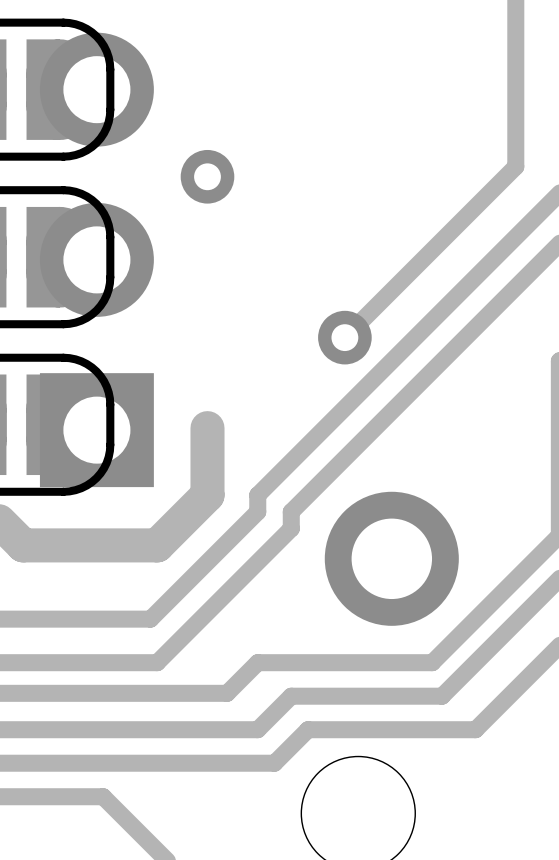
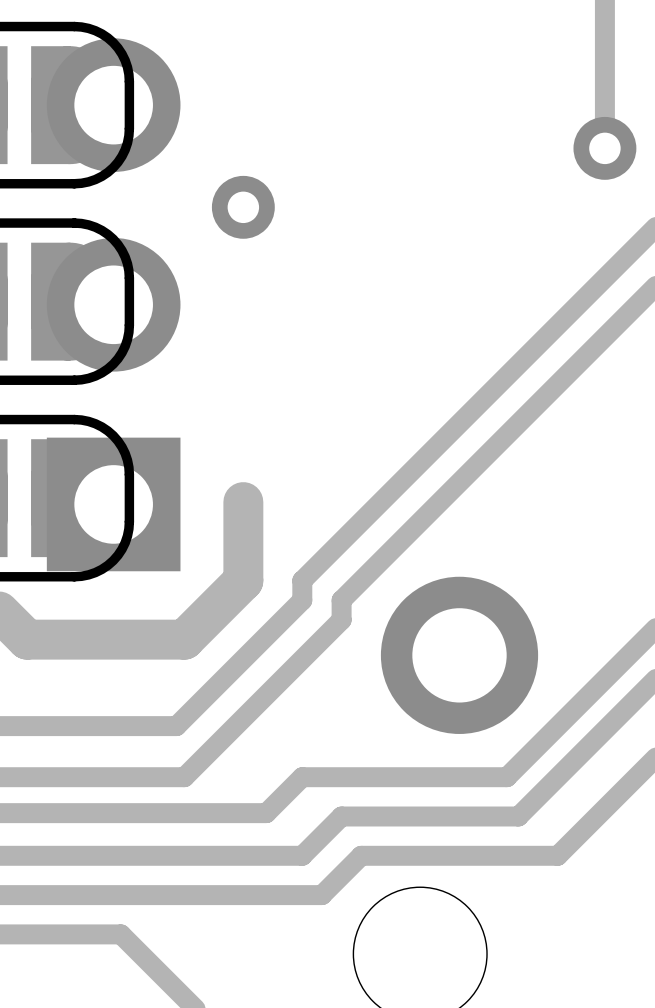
track: (515, 126) (515, 166) (344, 337) -> none
via position: (344, 337) -> (604, 148)

